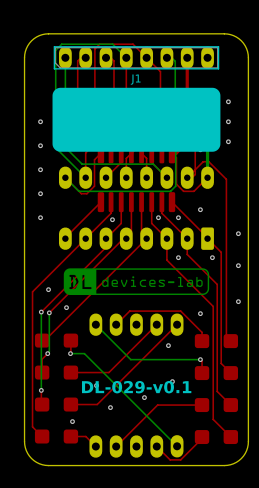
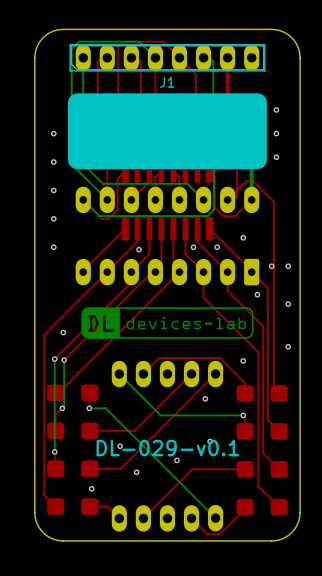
via: none -> (271, 266)
via: (178, 257) -> none
via: (66, 307) -> none

